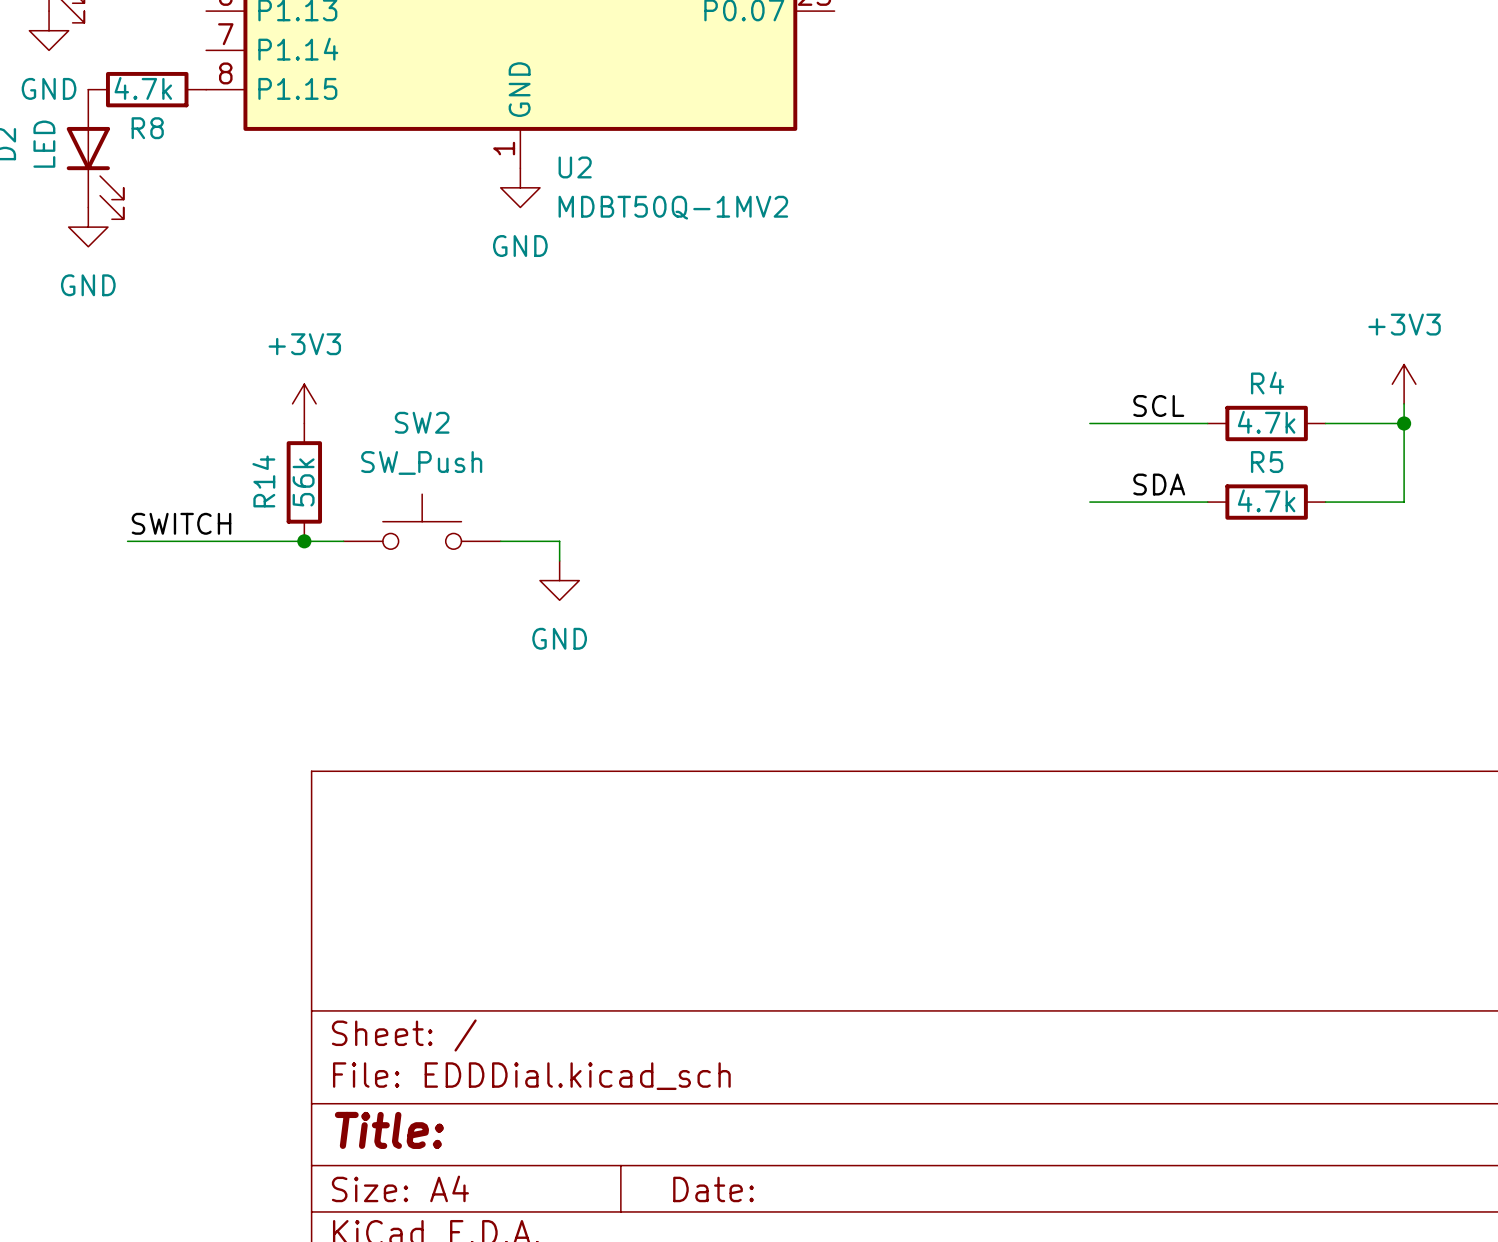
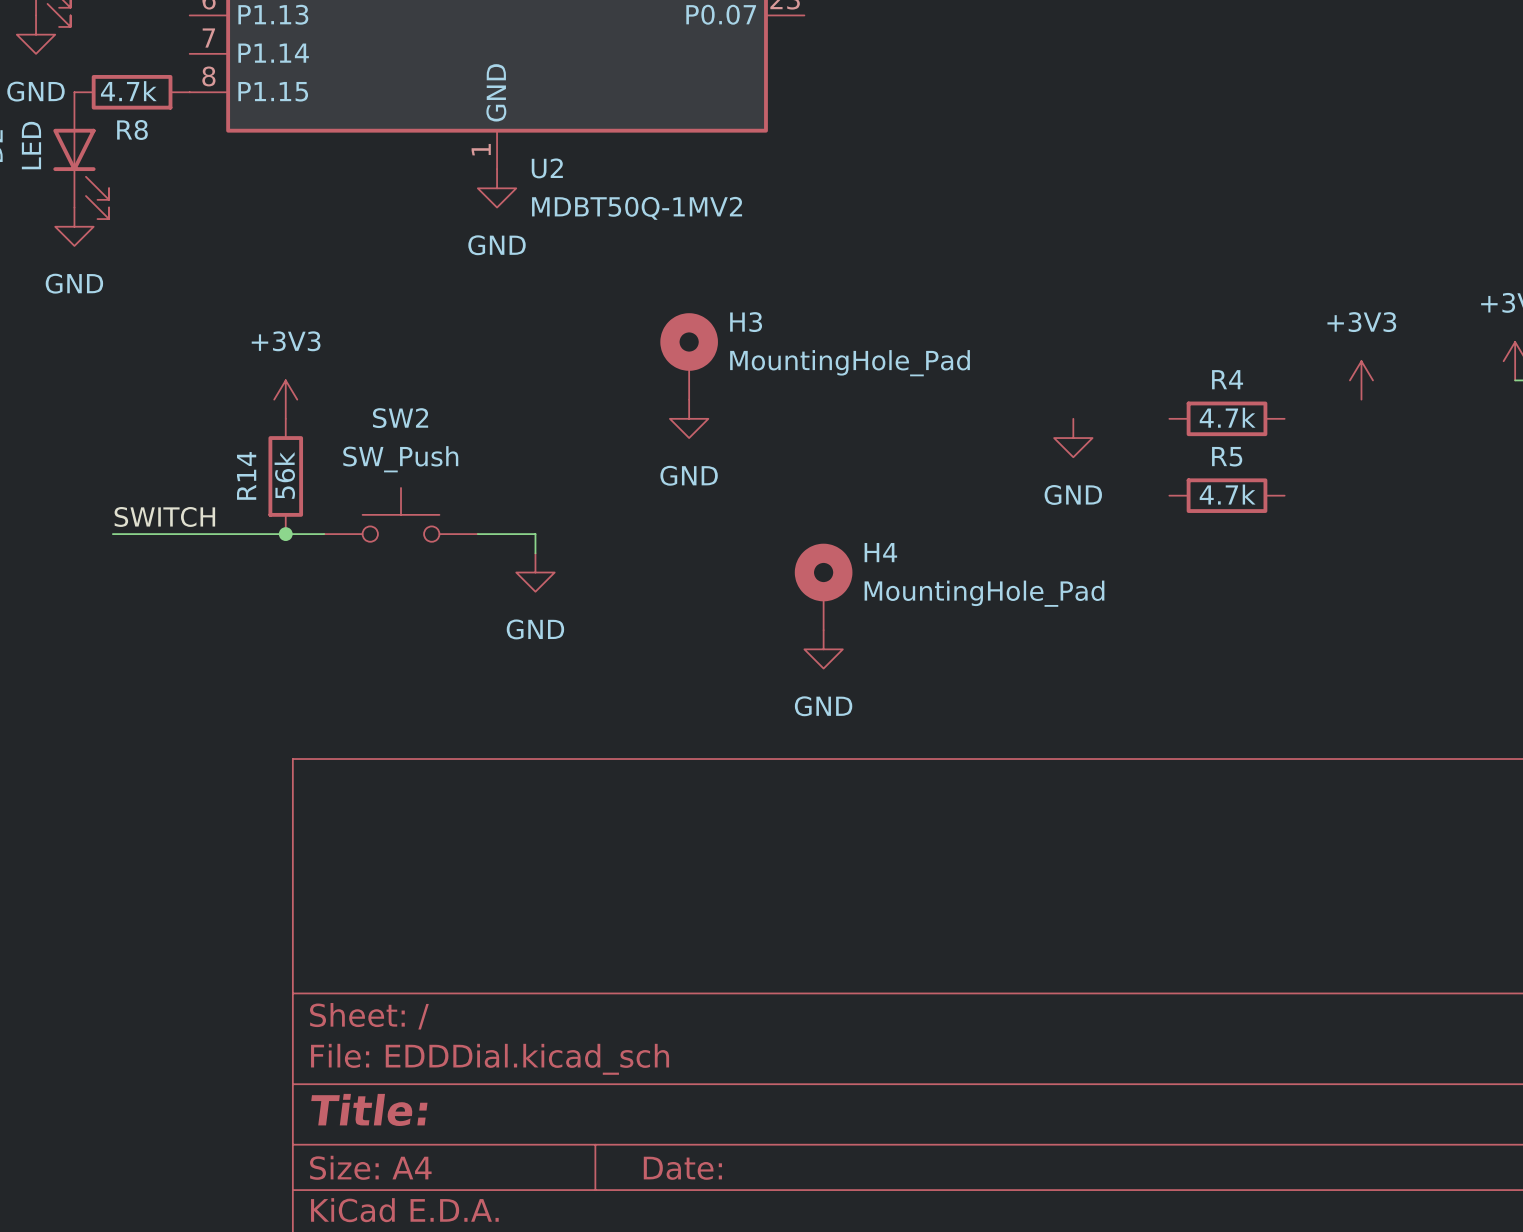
H3: none -> MountingHole_Pad (689, 356)
wire: (1404, 403) (1404, 502) (1325, 502) -> none
label: SCL (1158, 405) -> none
power symbol: none -> GND (689, 418)
wire: (1089, 423) (1207, 423) -> none
wire: (1325, 423) (1404, 423) -> none
junction: (1404, 423) -> none
power symbol: none -> GND (1073, 438)
label: SDA (1159, 484) -> none
wire: (1089, 502) (1207, 502) -> none
H4: none -> MountingHole_Pad (823, 586)
power symbol: none -> GND (823, 649)

